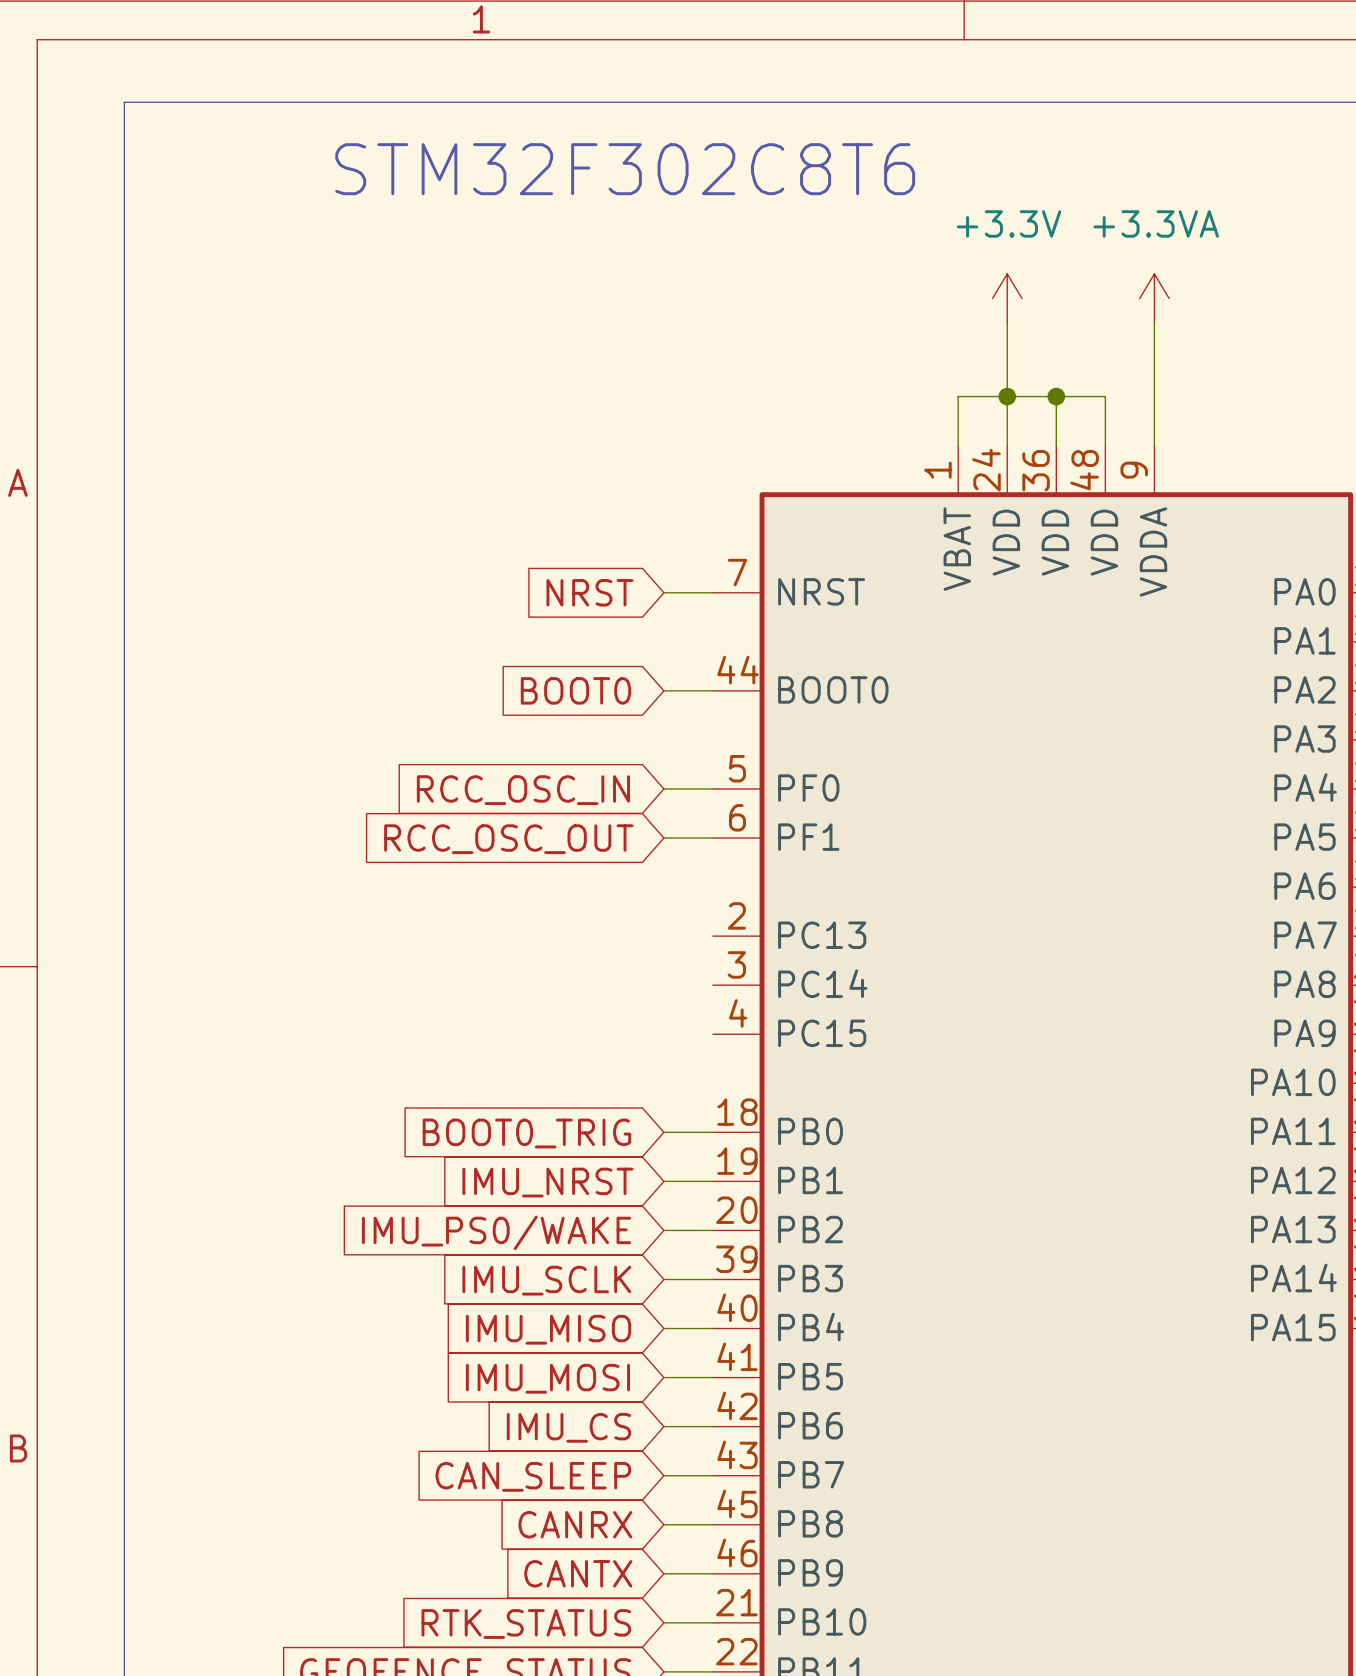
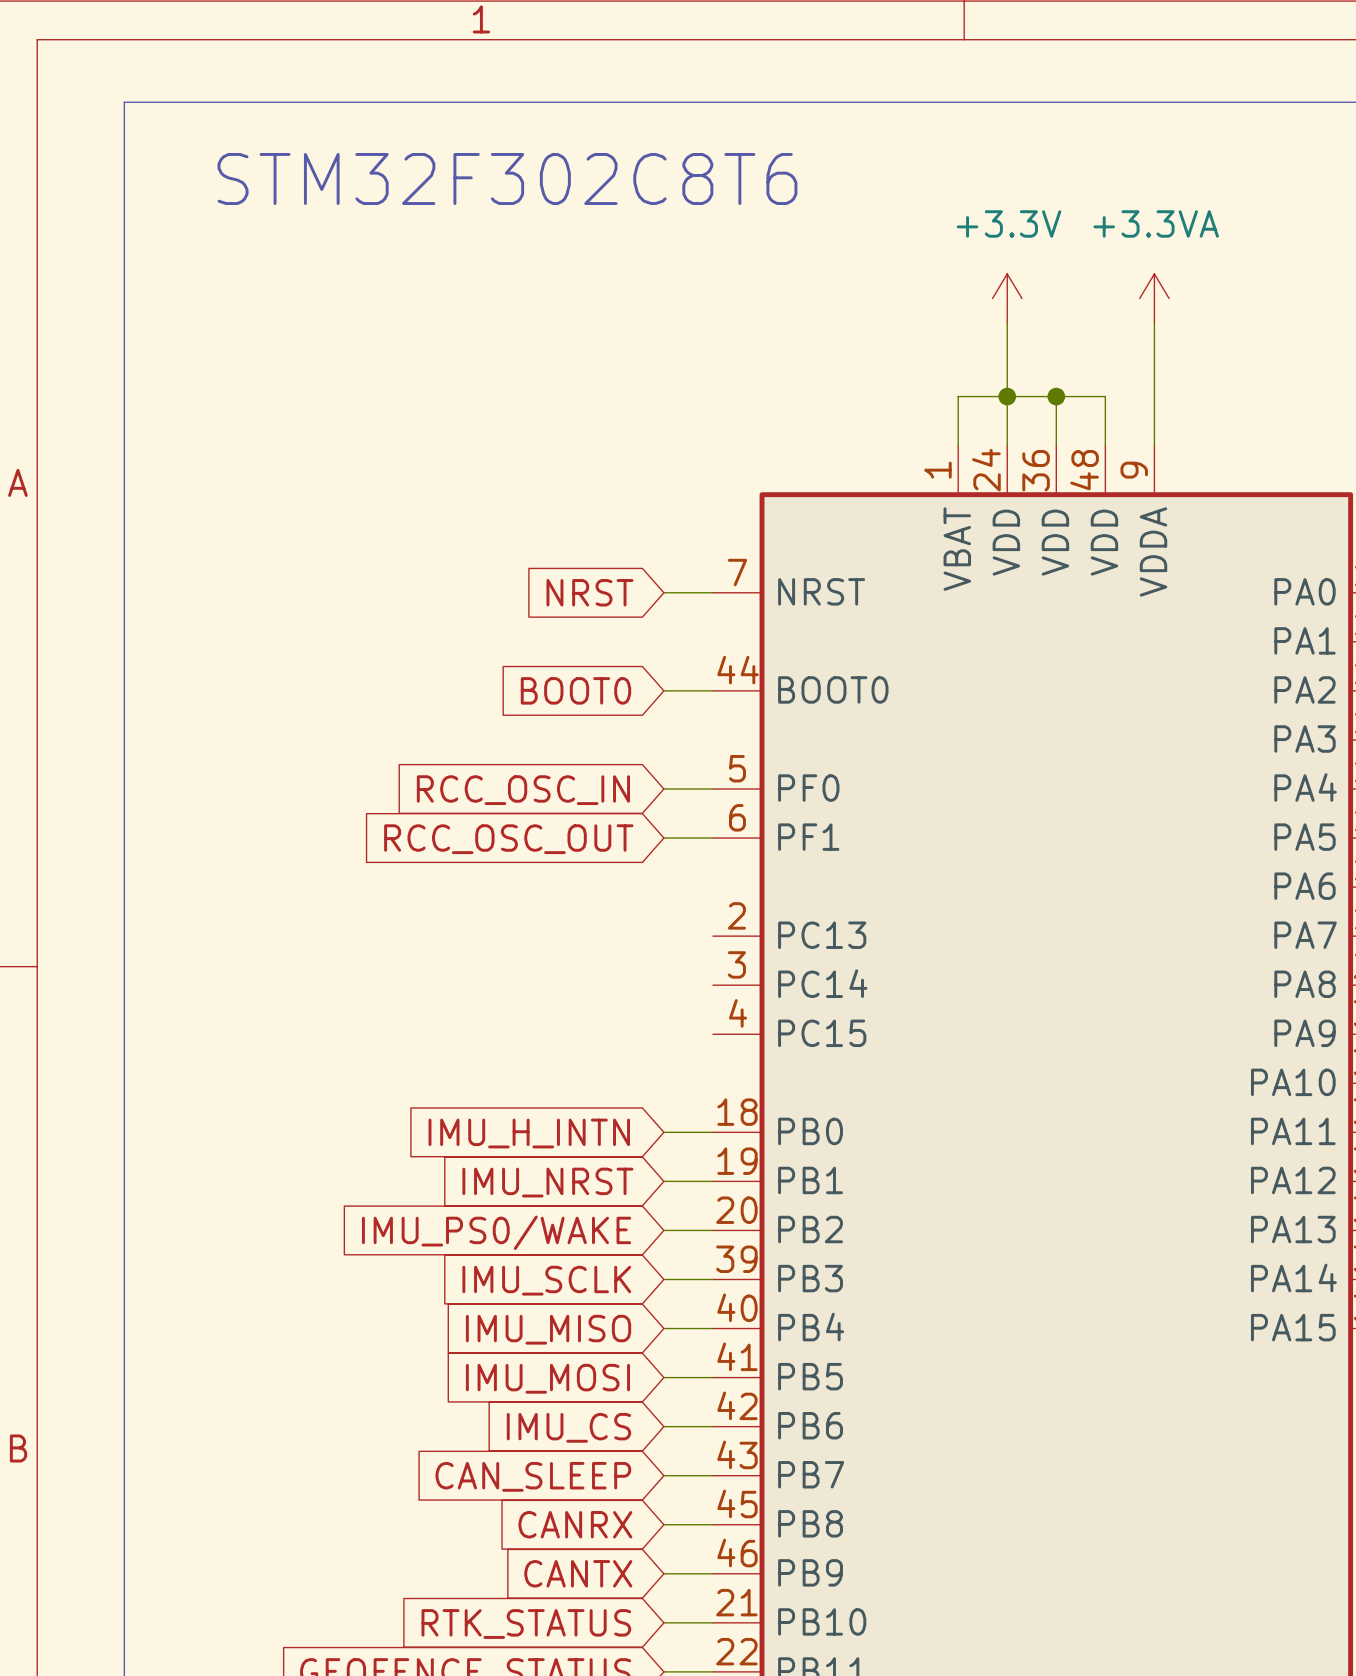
text position: STM32F302C8T6 (625, 169) -> STM32F302C8T6 (507, 178)
global label: BOOT0_TRIG (526, 1133) -> IMU_H_INTN (529, 1133)

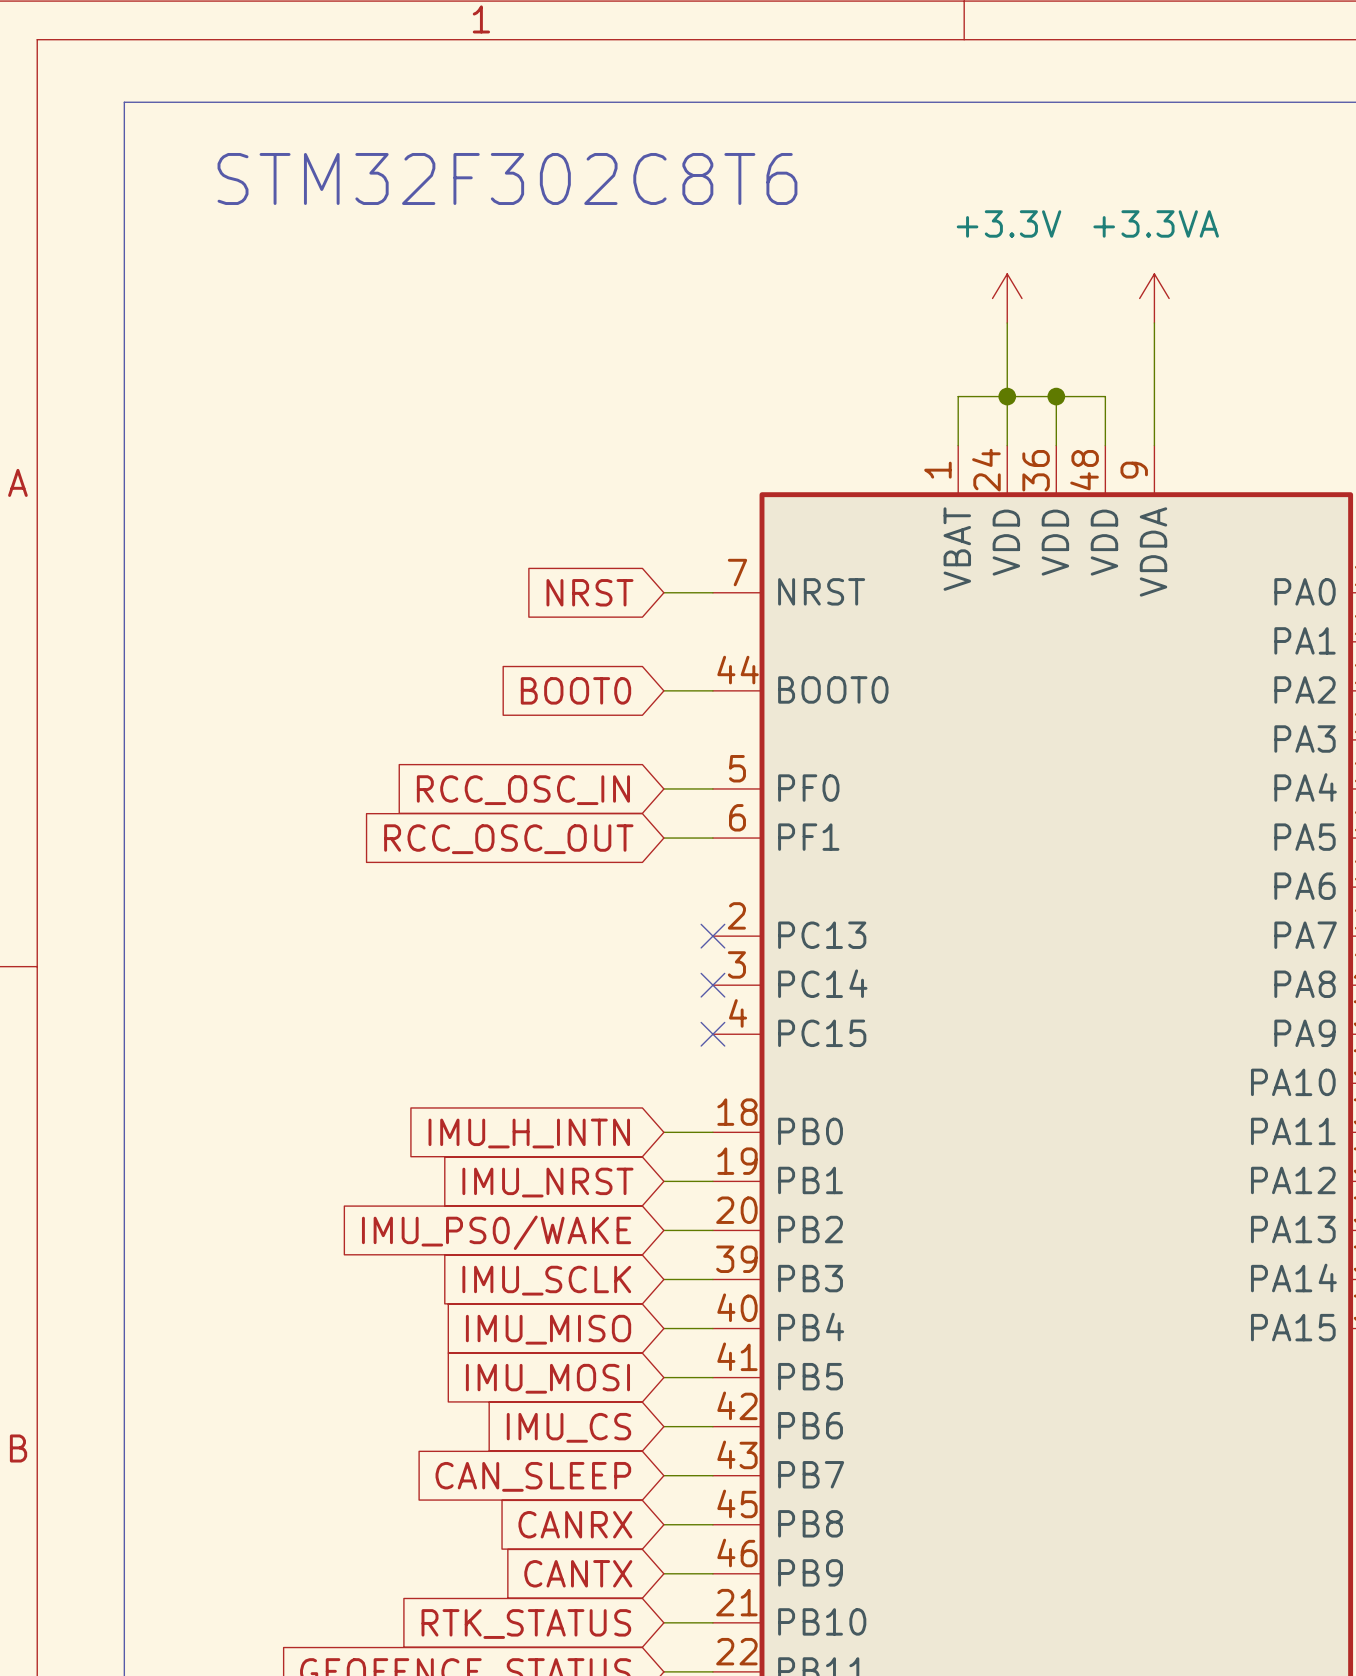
no-connect mark: none -> (712, 936)
no-connect mark: none -> (712, 985)
no-connect mark: none -> (712, 1034)

